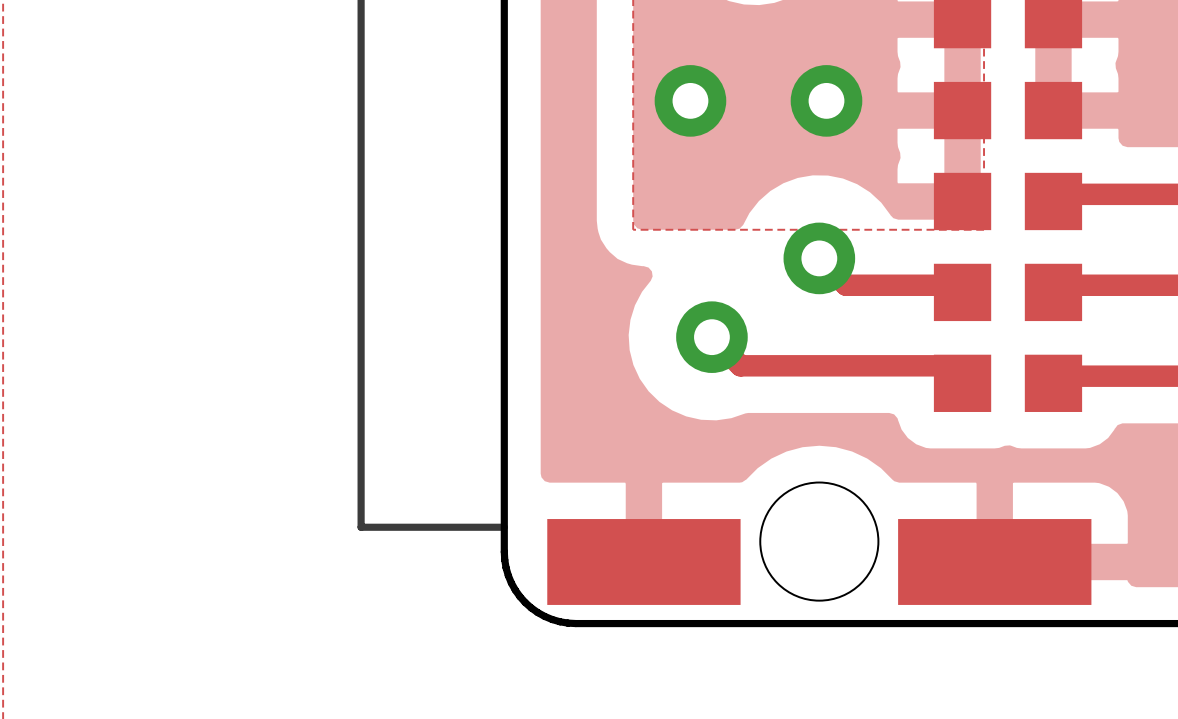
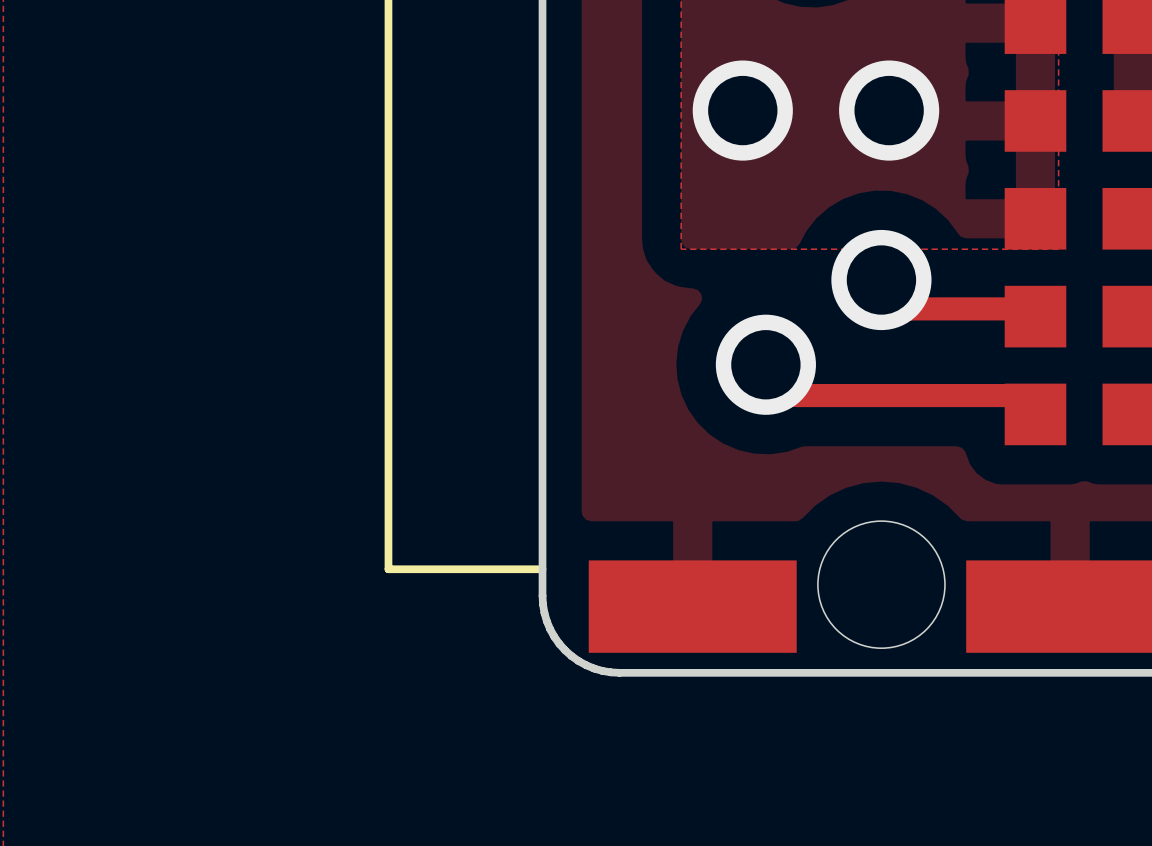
via size: [654, 65, 727, 137] -> [692, 60, 793, 161]
via size: [790, 65, 863, 137] -> [839, 60, 940, 161]
via size: [783, 222, 856, 295] -> [831, 229, 932, 331]
via size: [676, 301, 748, 373] -> [715, 314, 816, 415]

